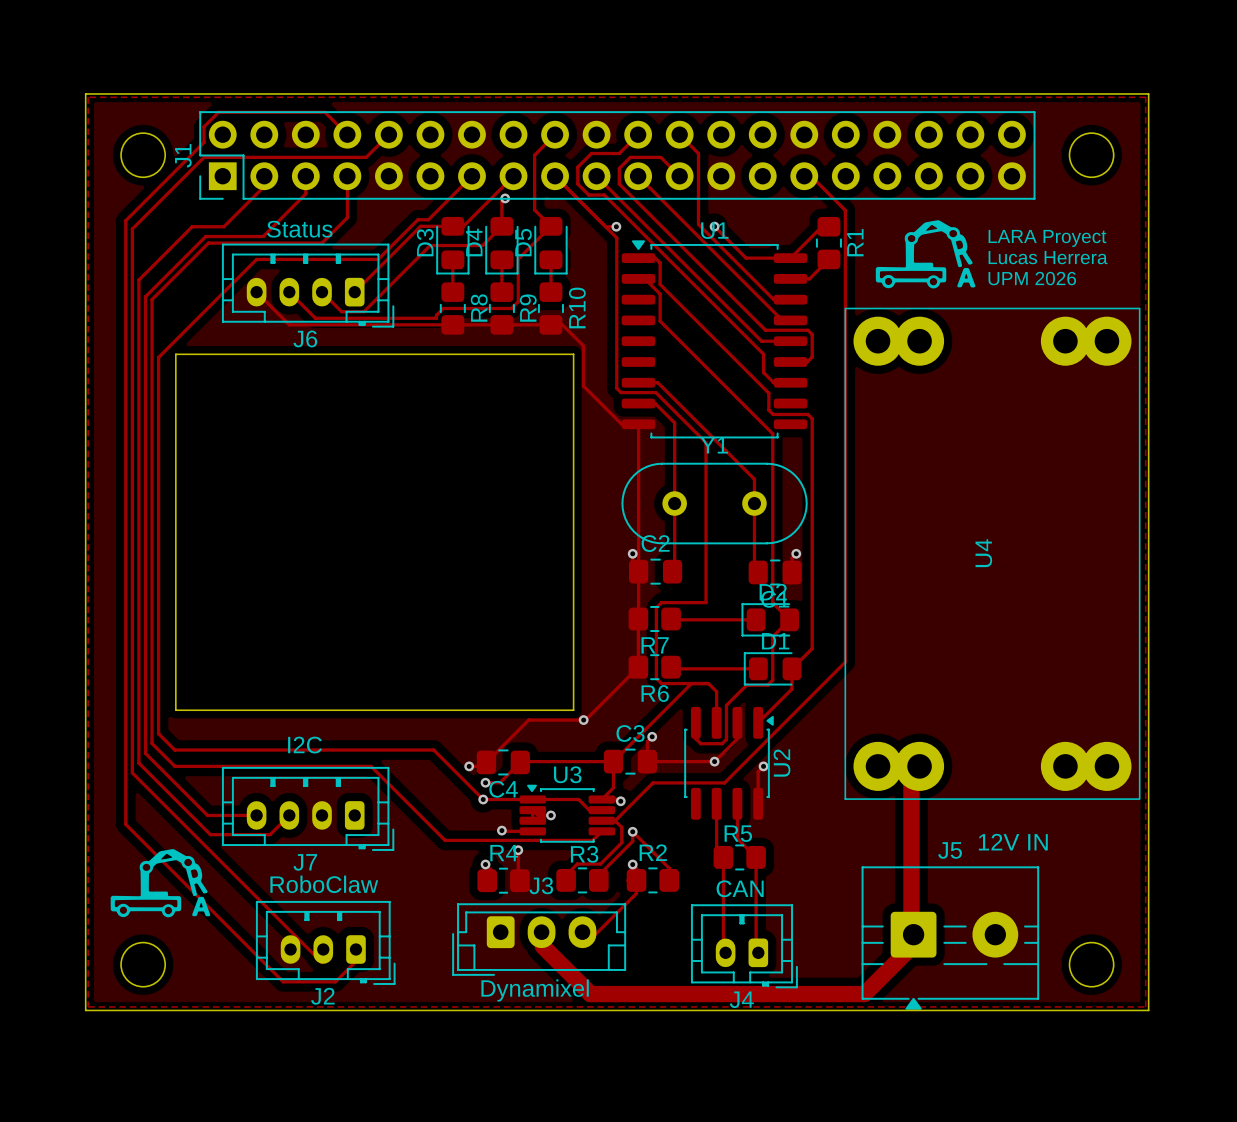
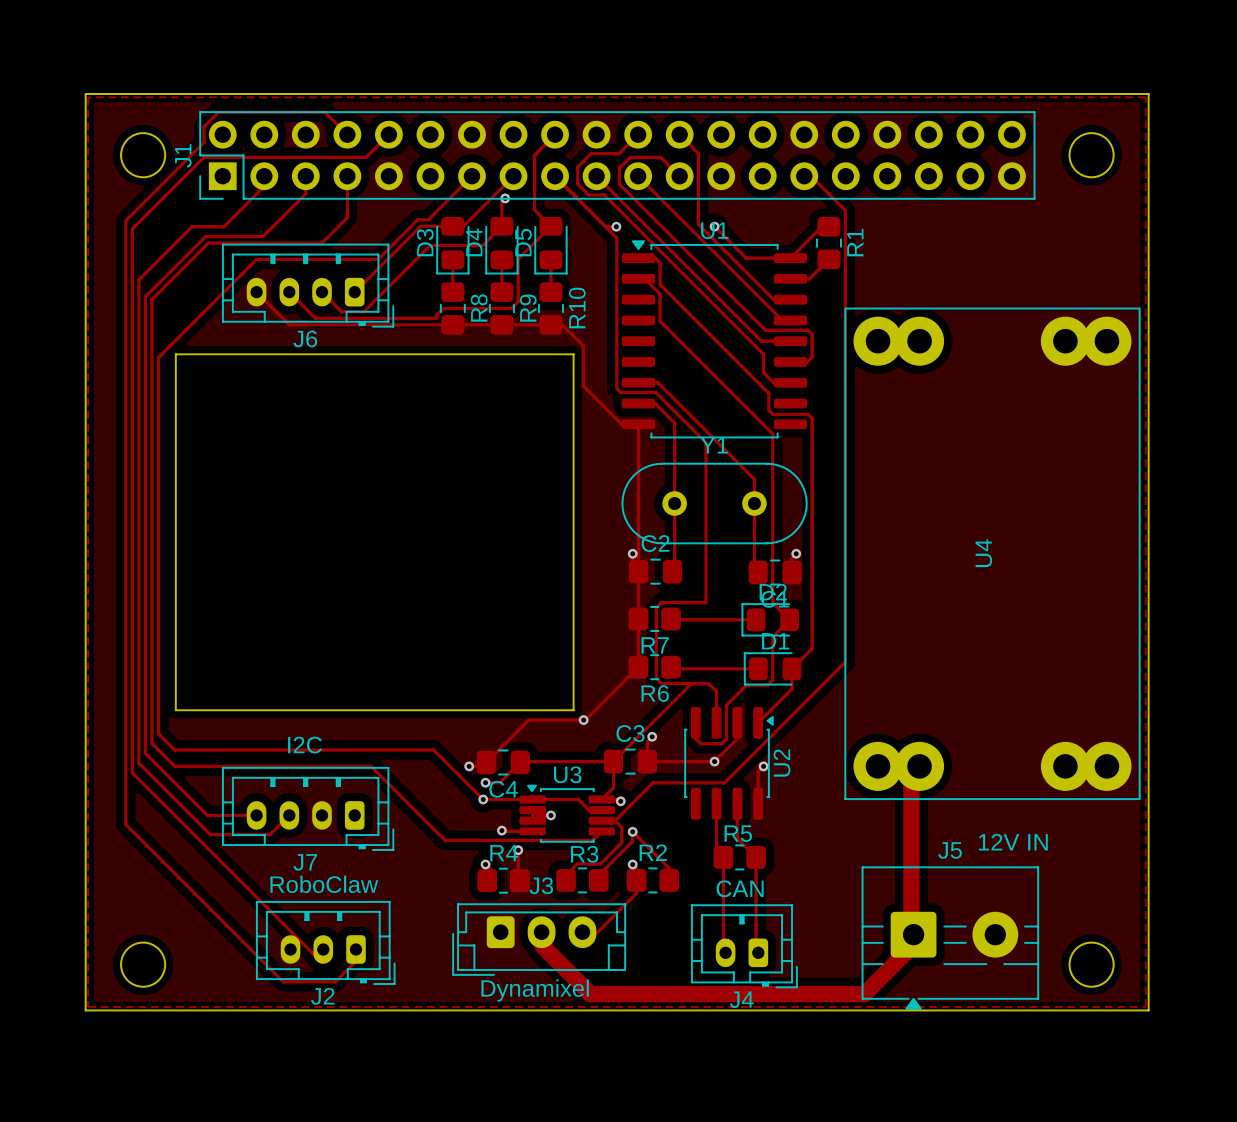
drawing: [875, 220, 976, 289] -> none
text: Status (299, 229) -> none
text: LARA Proyect (1047, 238) -> none
text: Lucas Herrera (1048, 257) -> none
text: UPM 2026 (1032, 278) -> none
drawing: [110, 849, 211, 918] -> none

